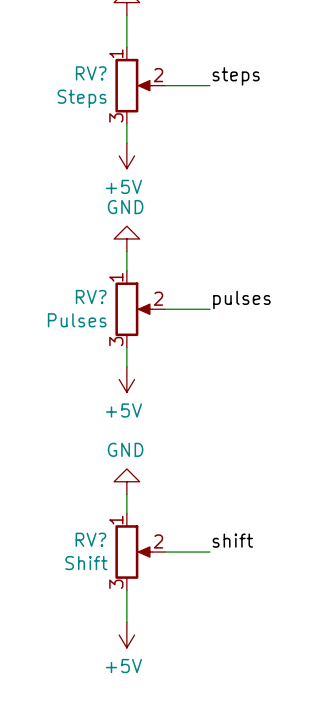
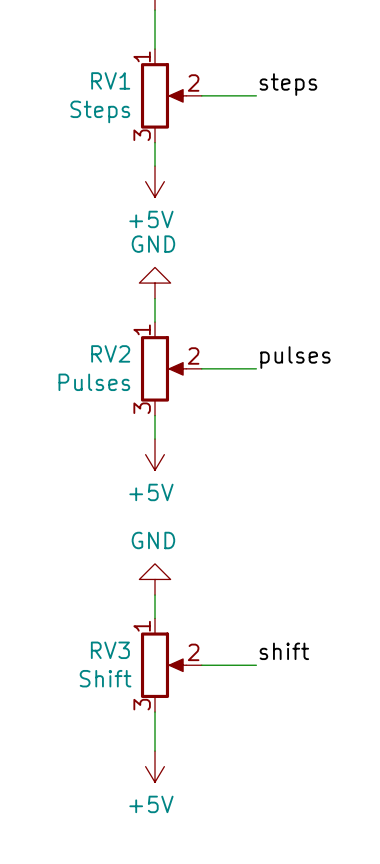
RV? name: RV? (91, 73) -> RV1 (110, 80)
RV? name: RV? (91, 297) -> RV2 (110, 353)
RV? name: RV? (90, 539) -> RV3 (110, 650)

